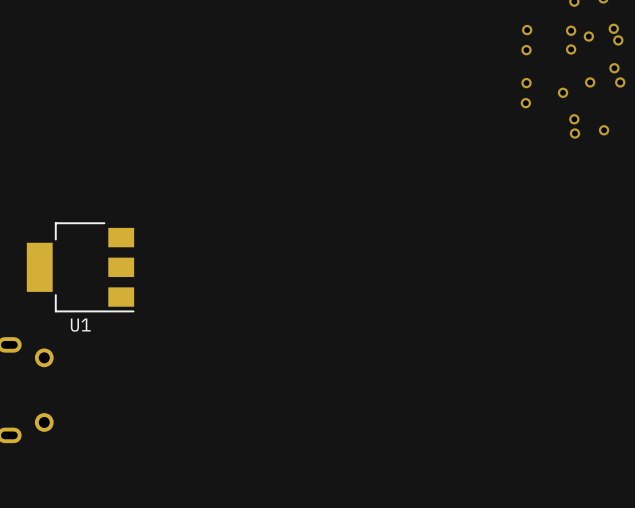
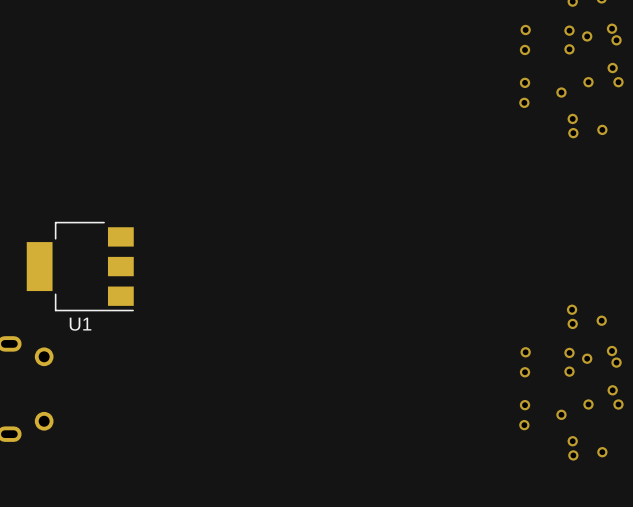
via: none -> (572, 309)
via: none -> (601, 320)
via: none -> (572, 323)
via: none -> (612, 351)
via: none -> (525, 352)
via: none -> (569, 352)
via: none -> (587, 358)
via: none -> (616, 362)
via: none -> (569, 371)
via: none -> (525, 372)
via: none -> (612, 390)
via: none -> (588, 404)
via: none -> (618, 404)
via: none -> (525, 405)
via: none -> (561, 414)
via: none -> (524, 425)
via: none -> (572, 441)
via: none -> (602, 452)
via: none -> (573, 455)

